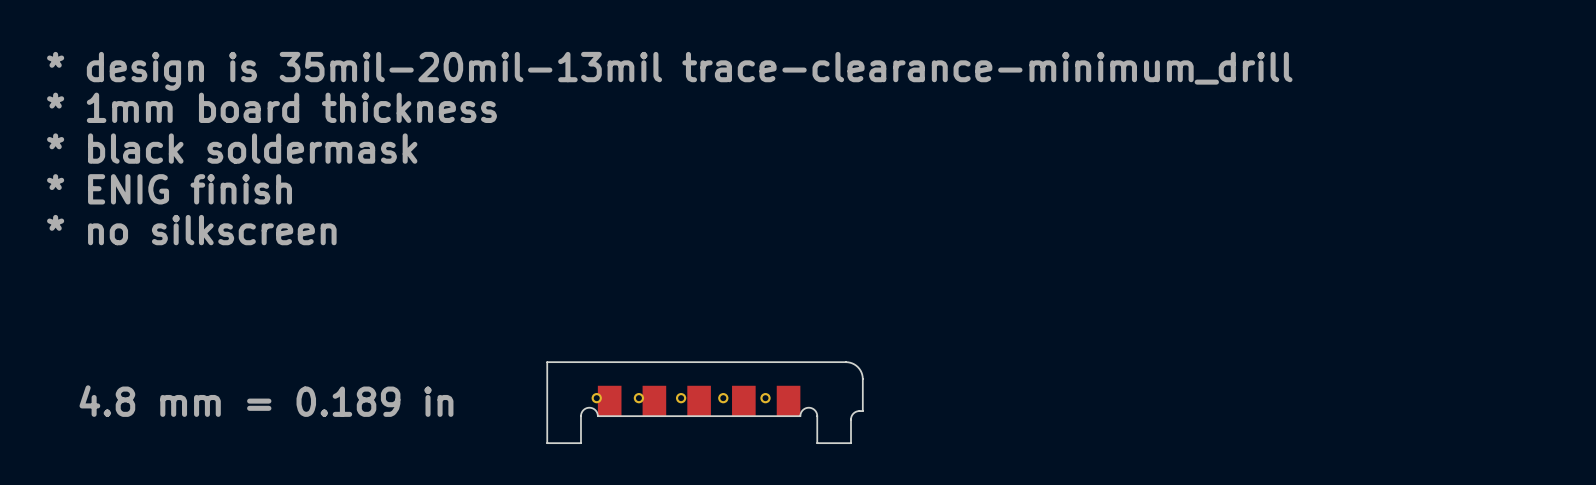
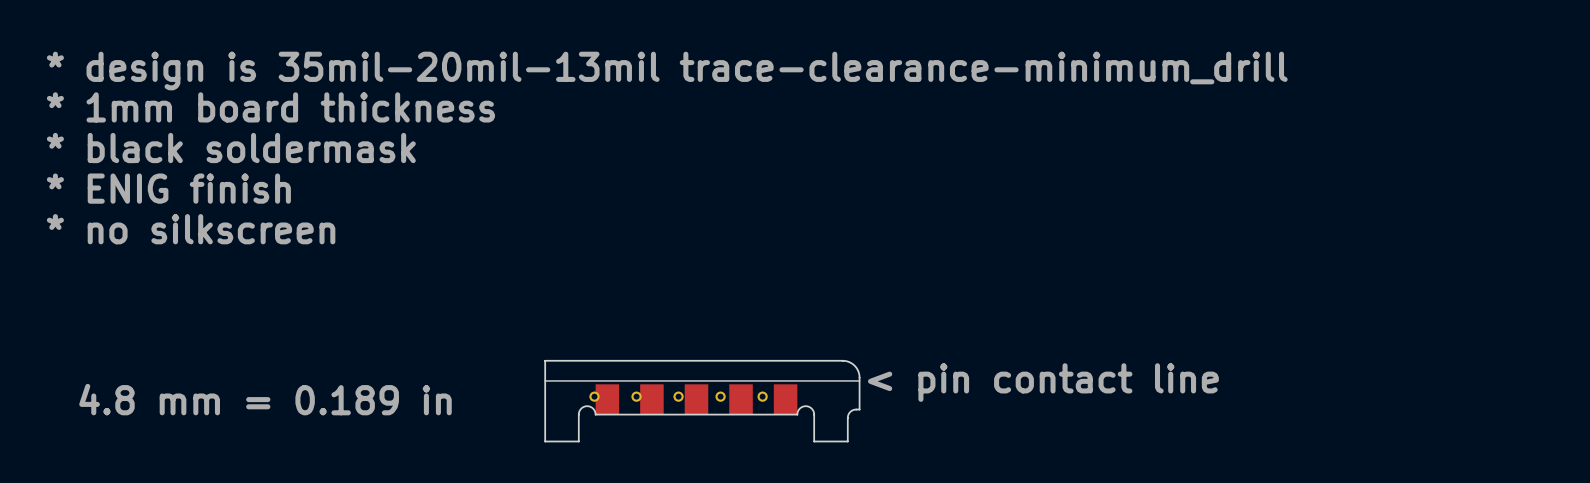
line: none -> (545, 380) (859, 380)
text: none -> < pin contact line (1043, 382)

